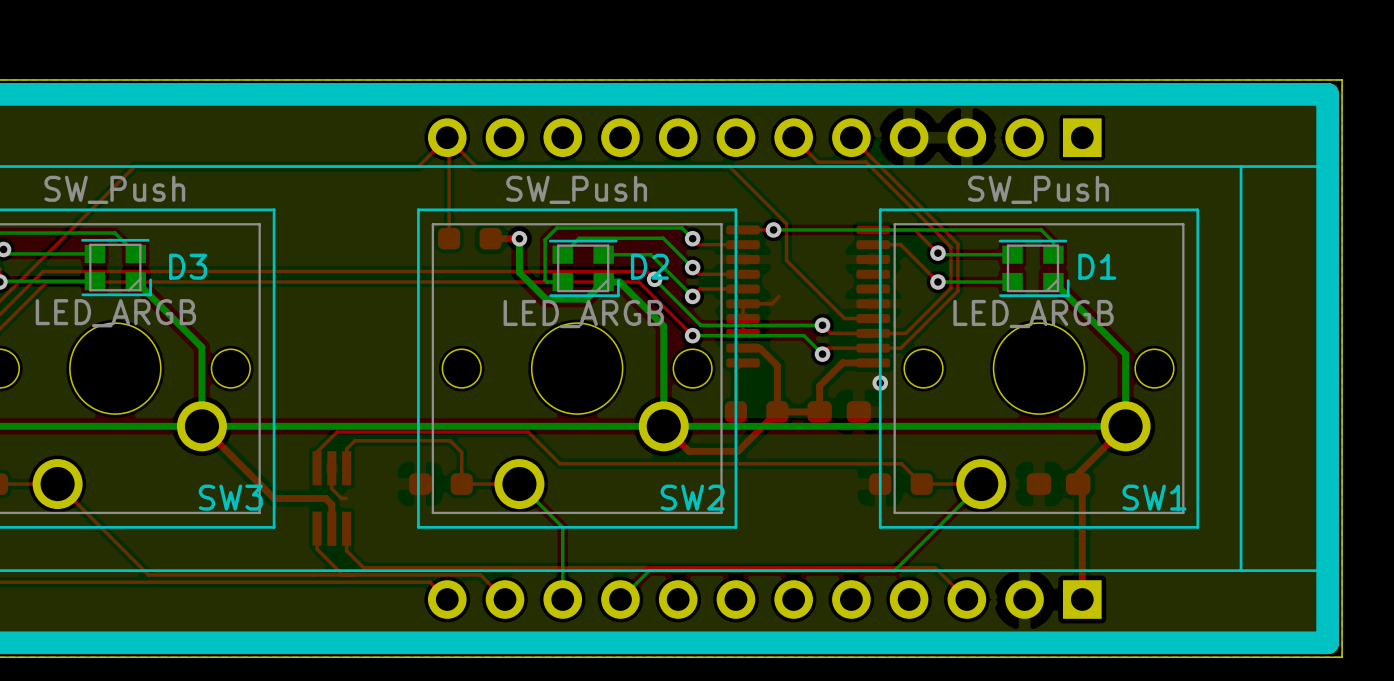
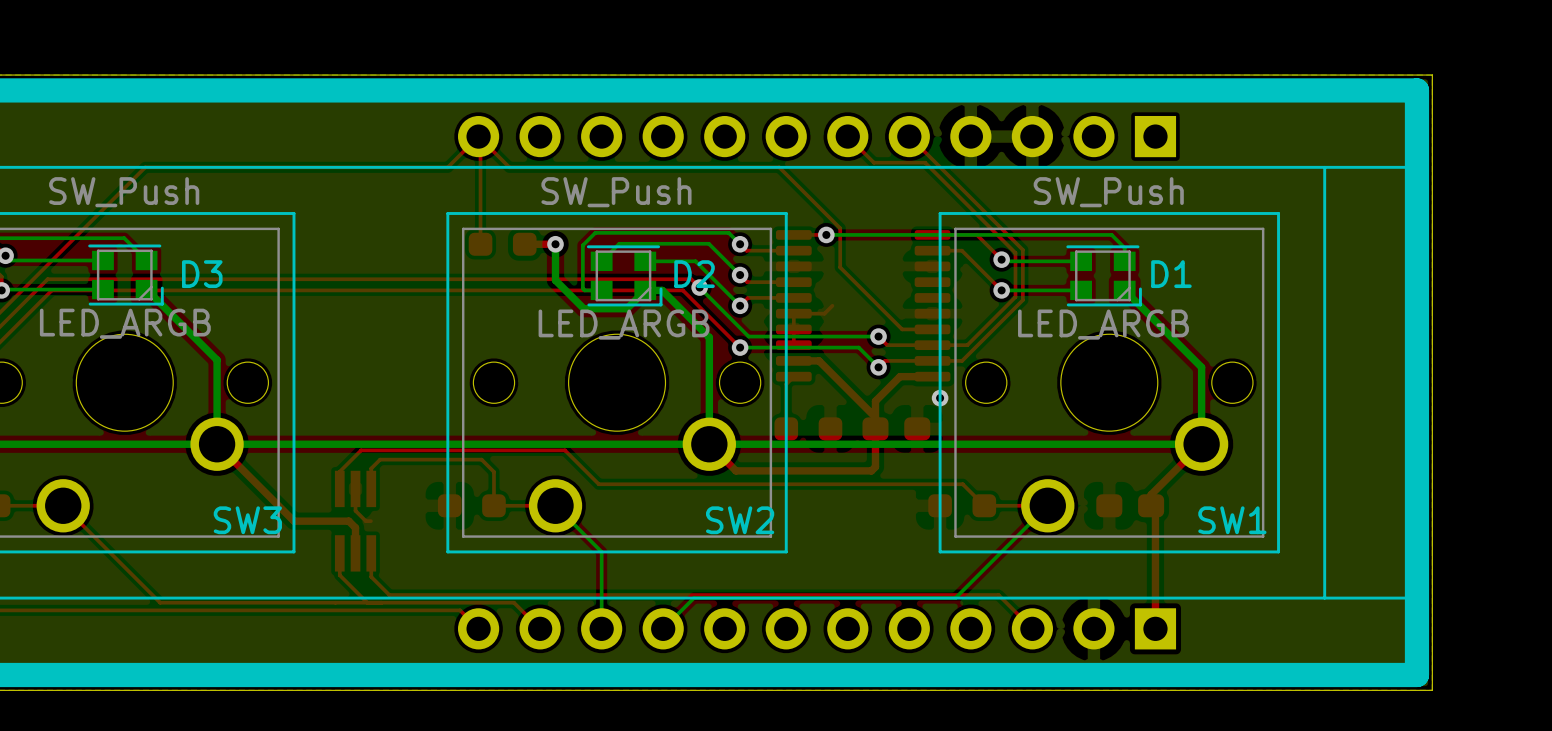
top track: (759, 348) (777, 365) (777, 411) -> (811, 360) (819, 360) (875, 417)
top track: (777, 411) (737, 451) -> (875, 428) (875, 466) (871, 470) (788, 470)
top track: (819, 411) (777, 411) -> none

